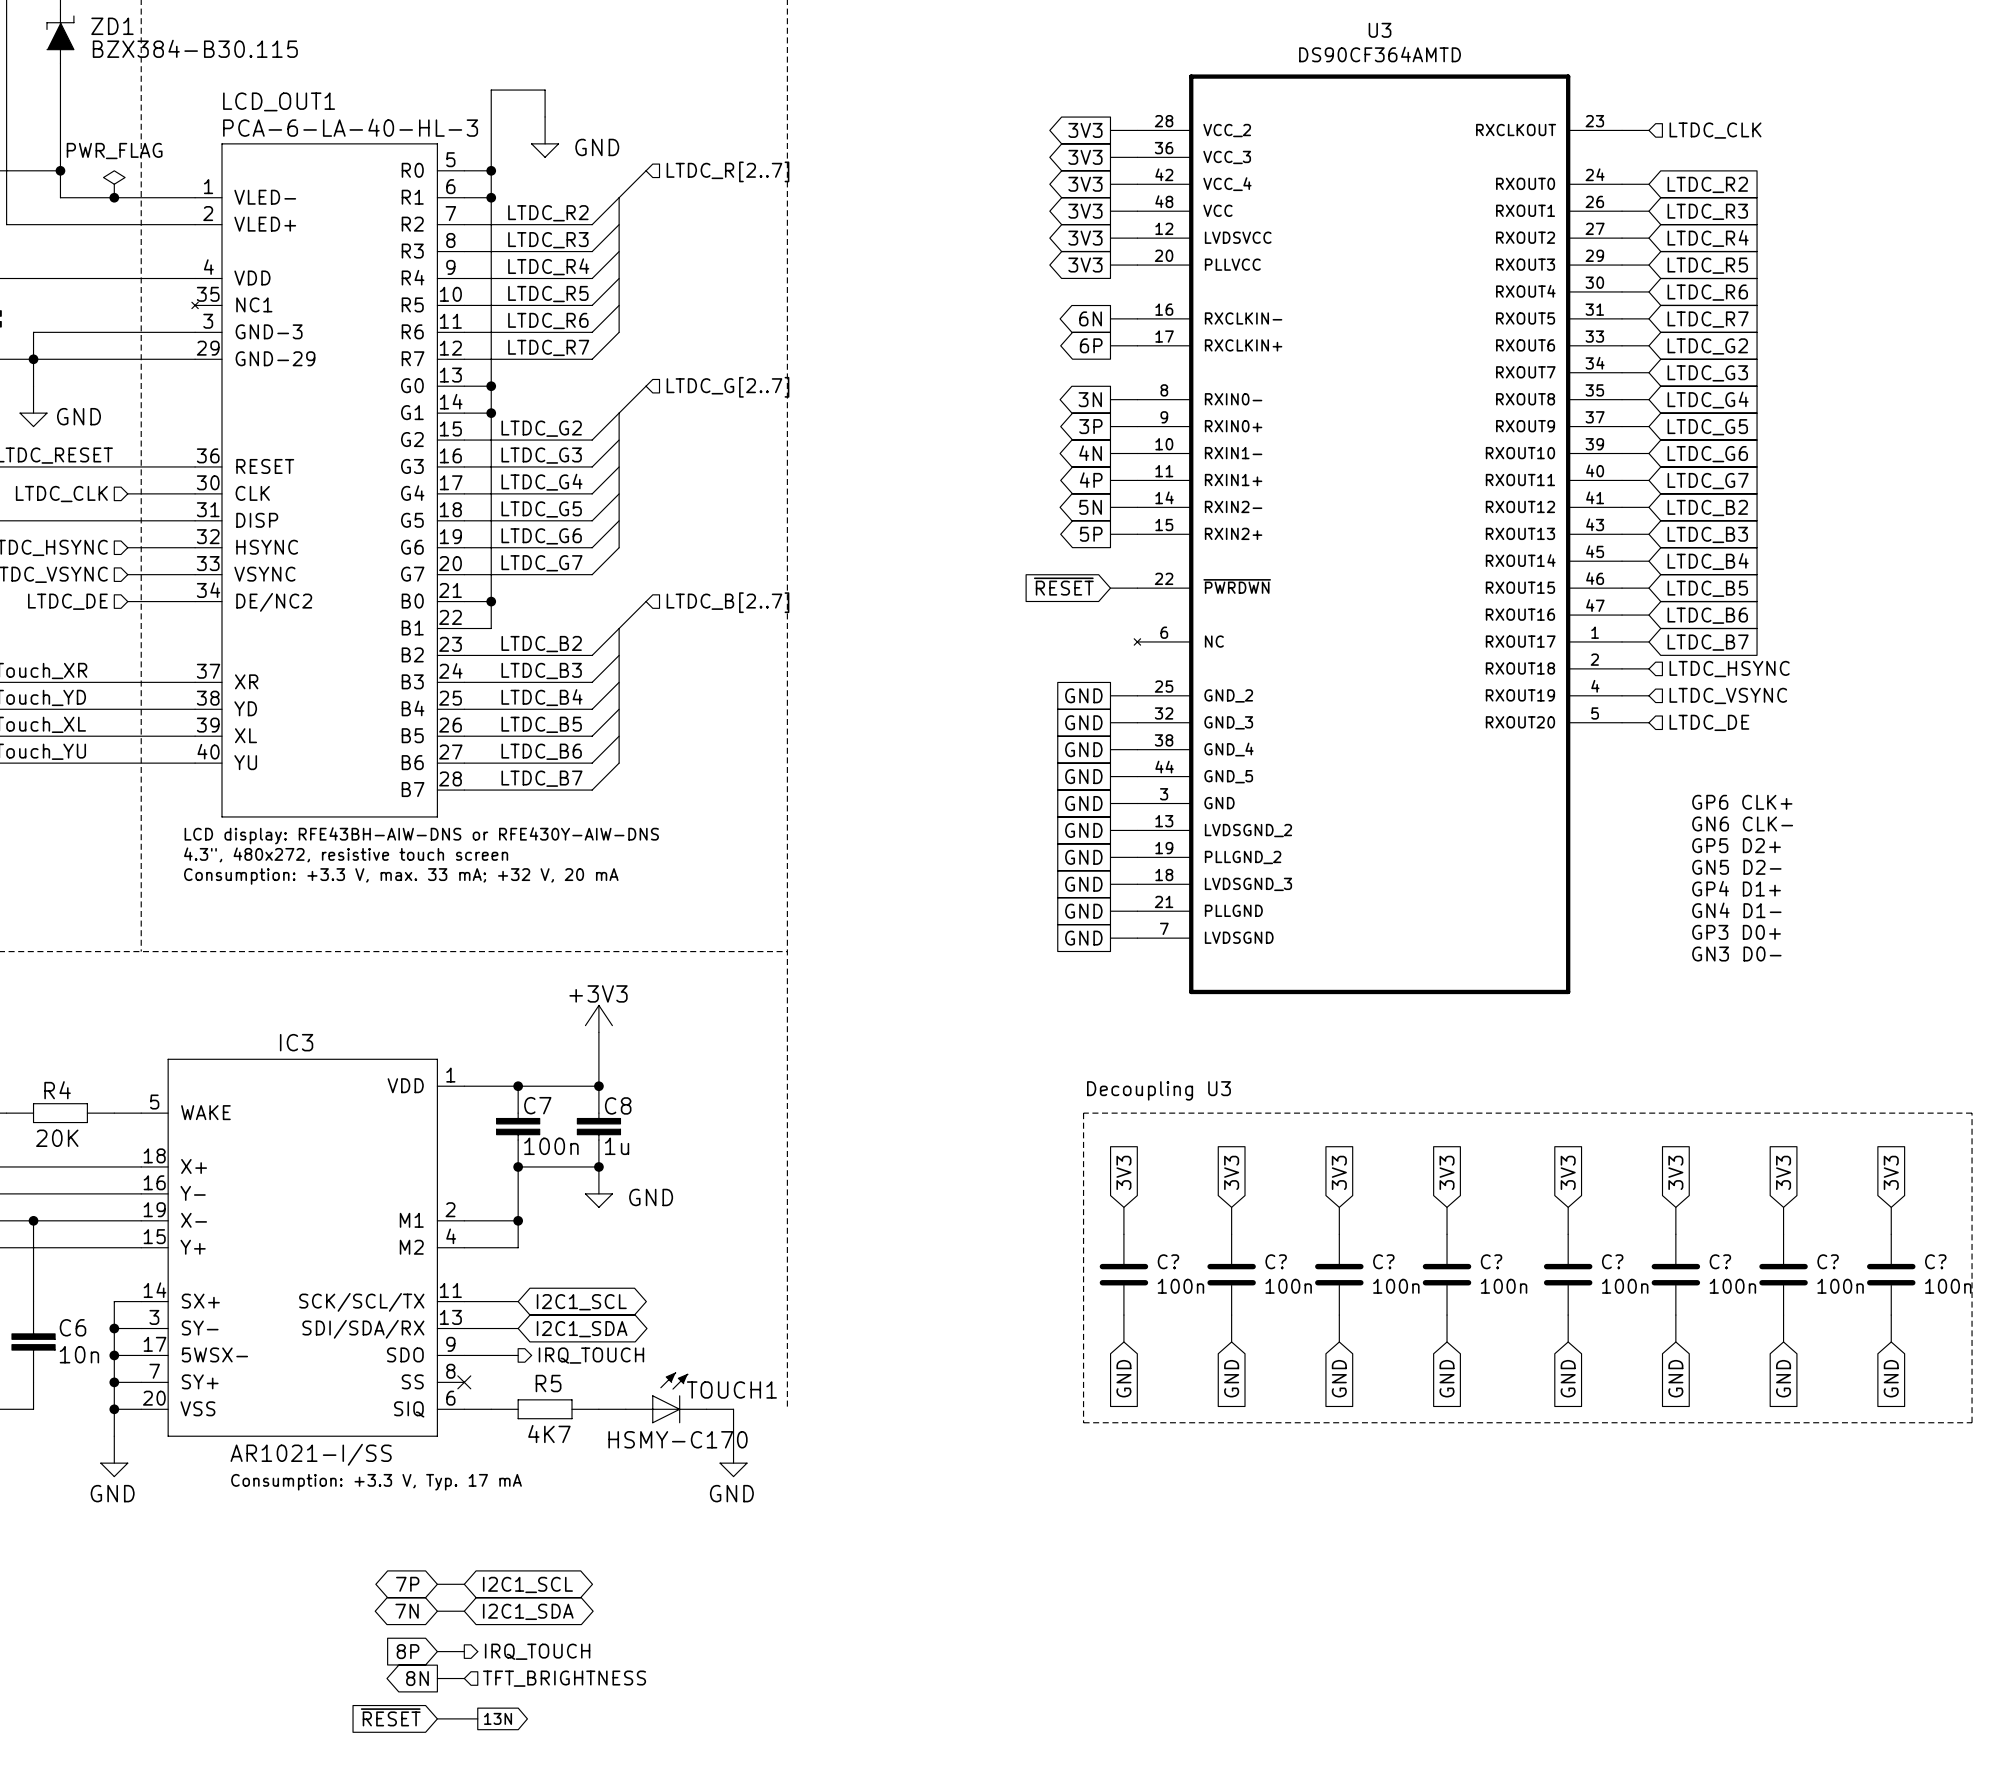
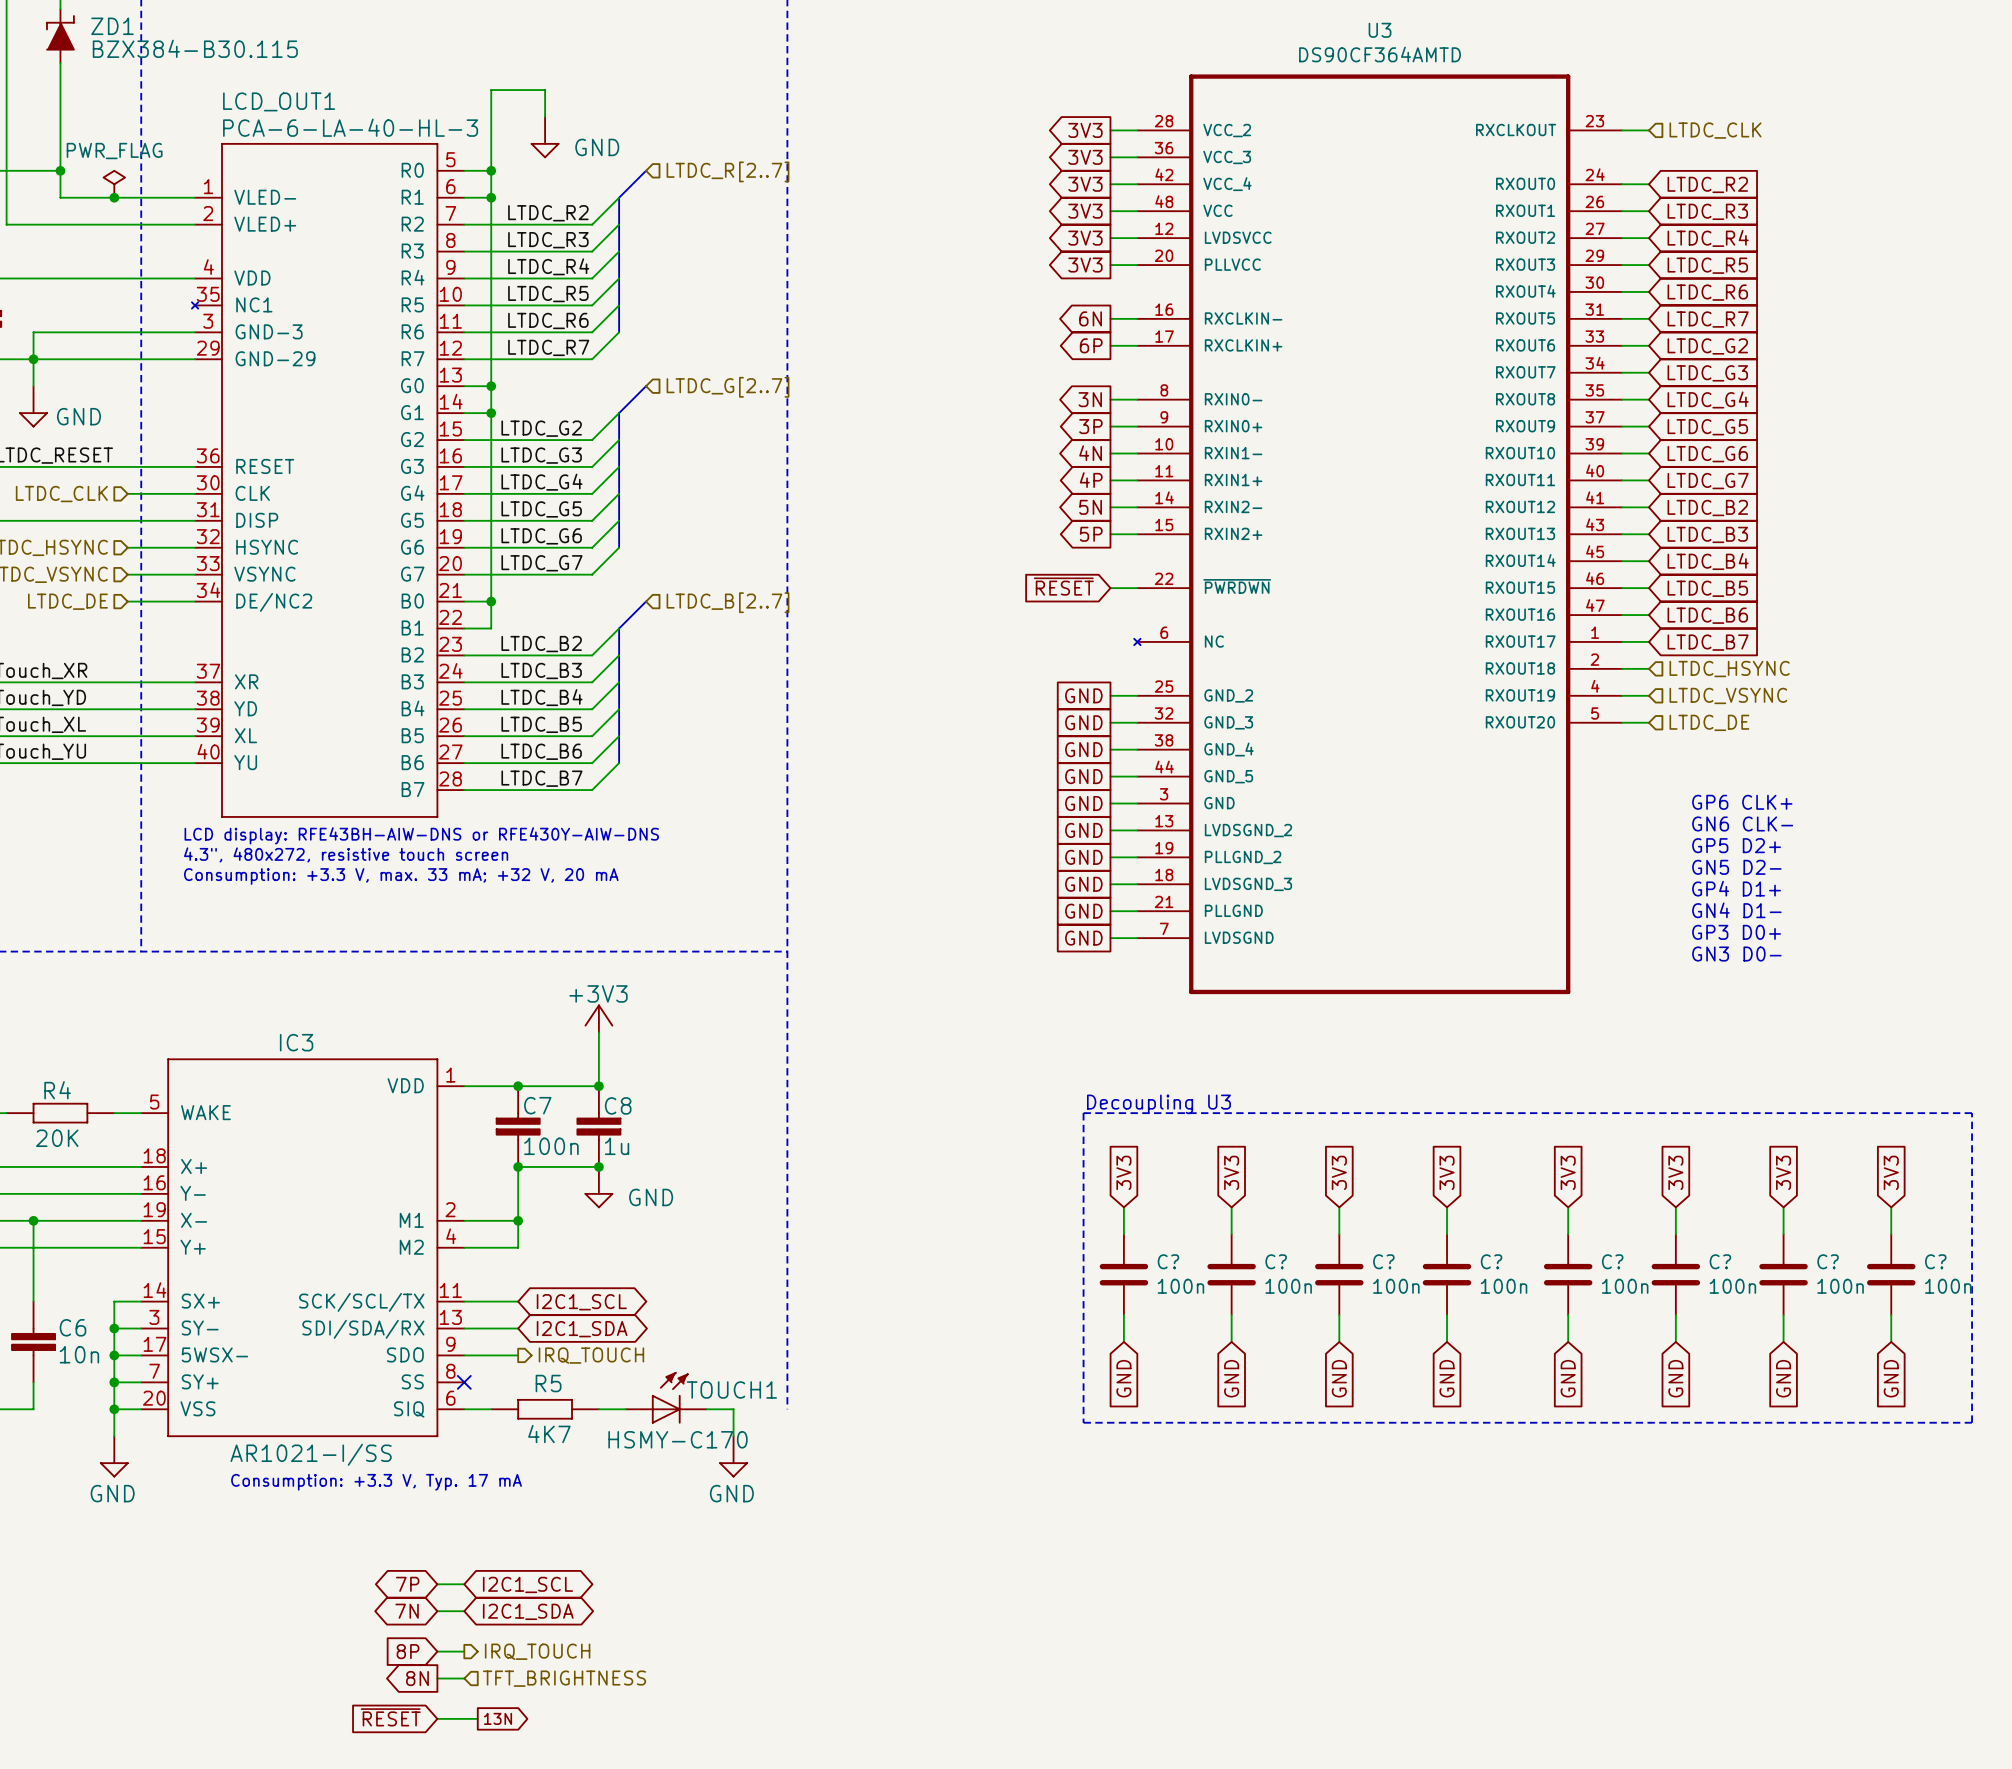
text position: Decoupling U3 (1158, 1090) -> Decoupling U3 (1158, 1104)

